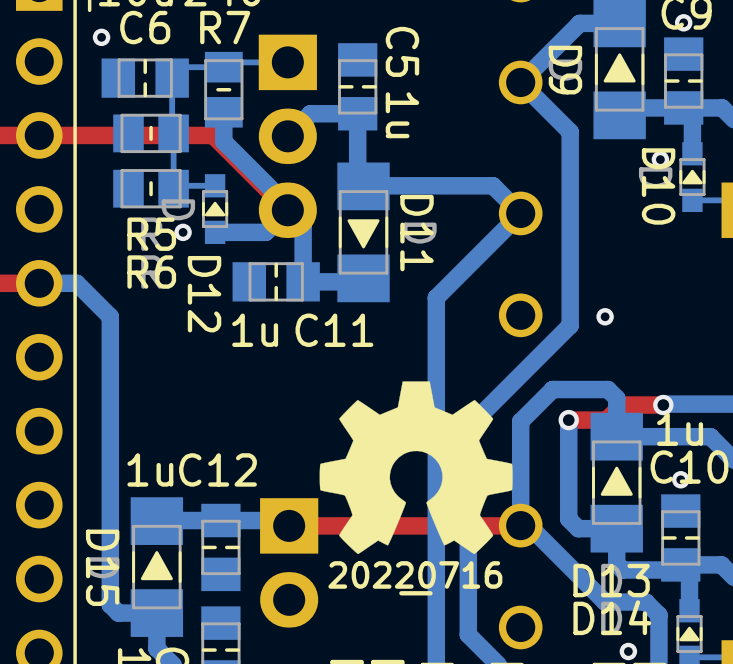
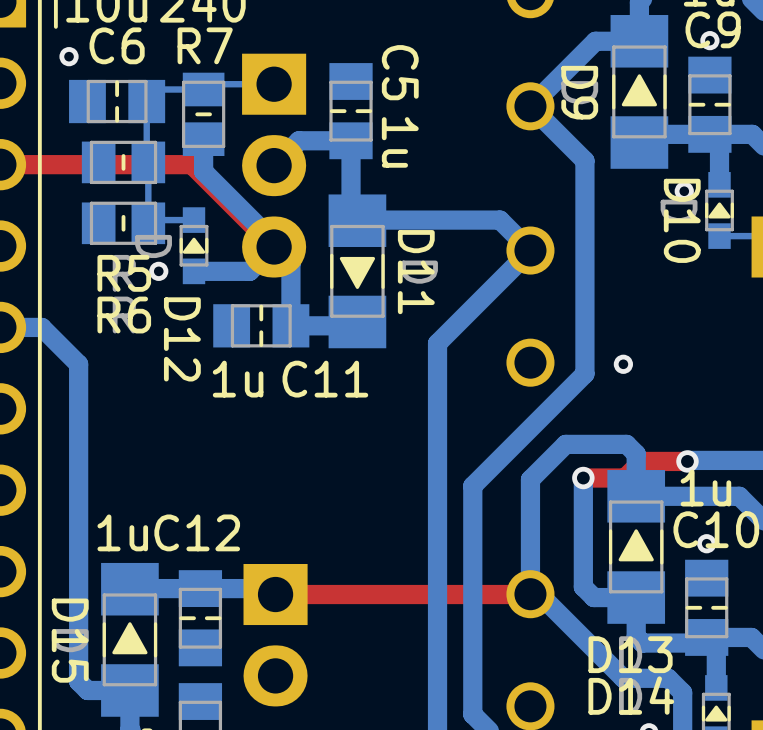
drawing: [319, 381, 513, 596] -> none

